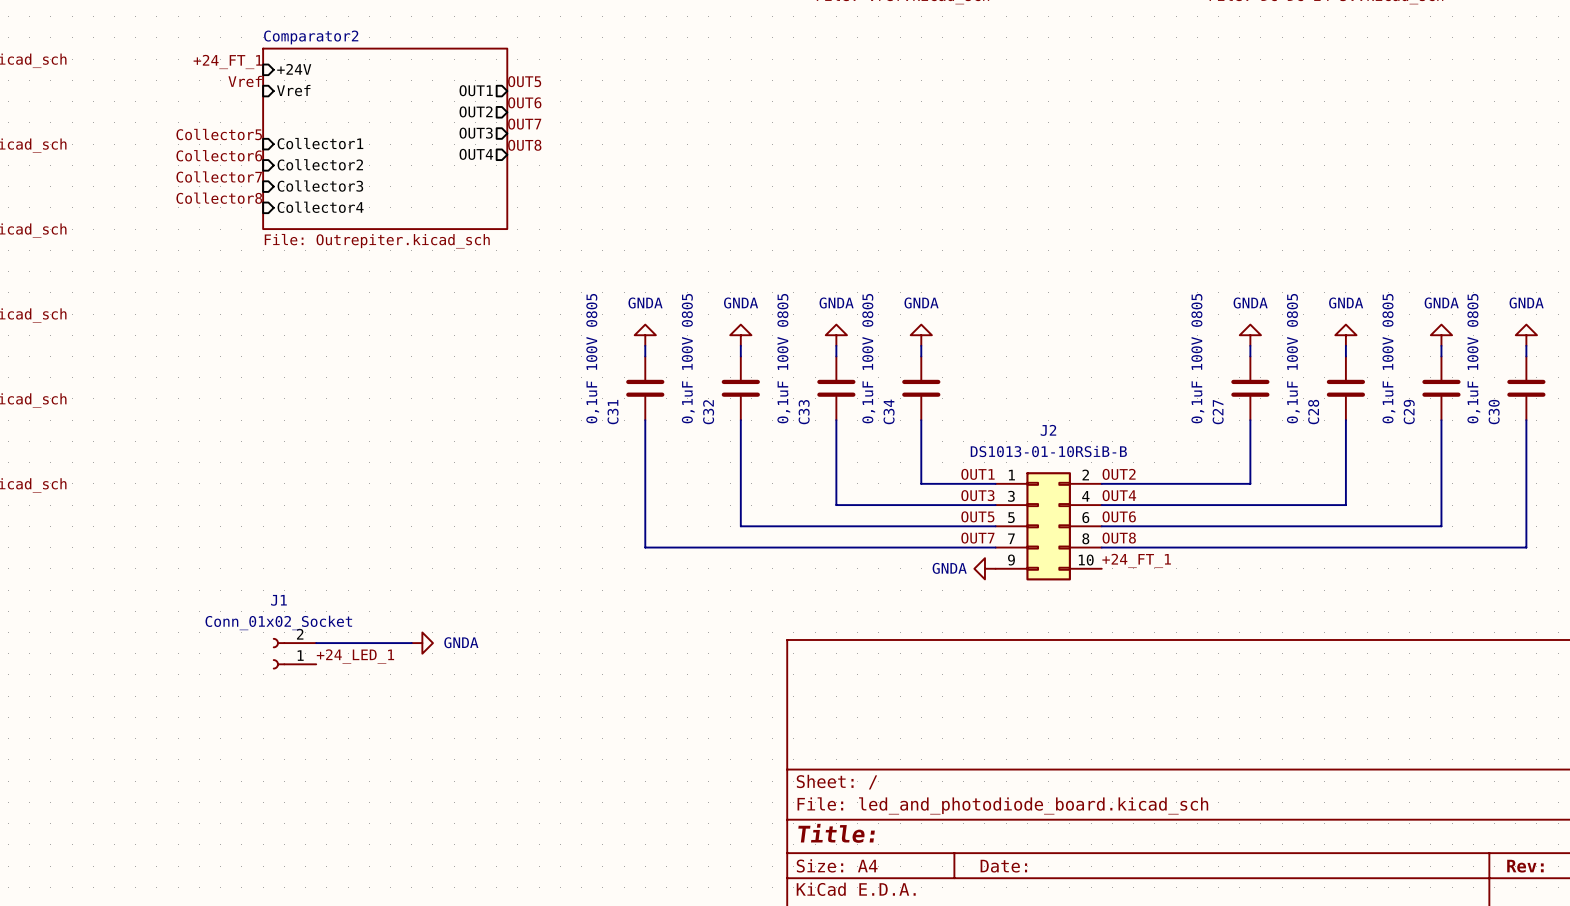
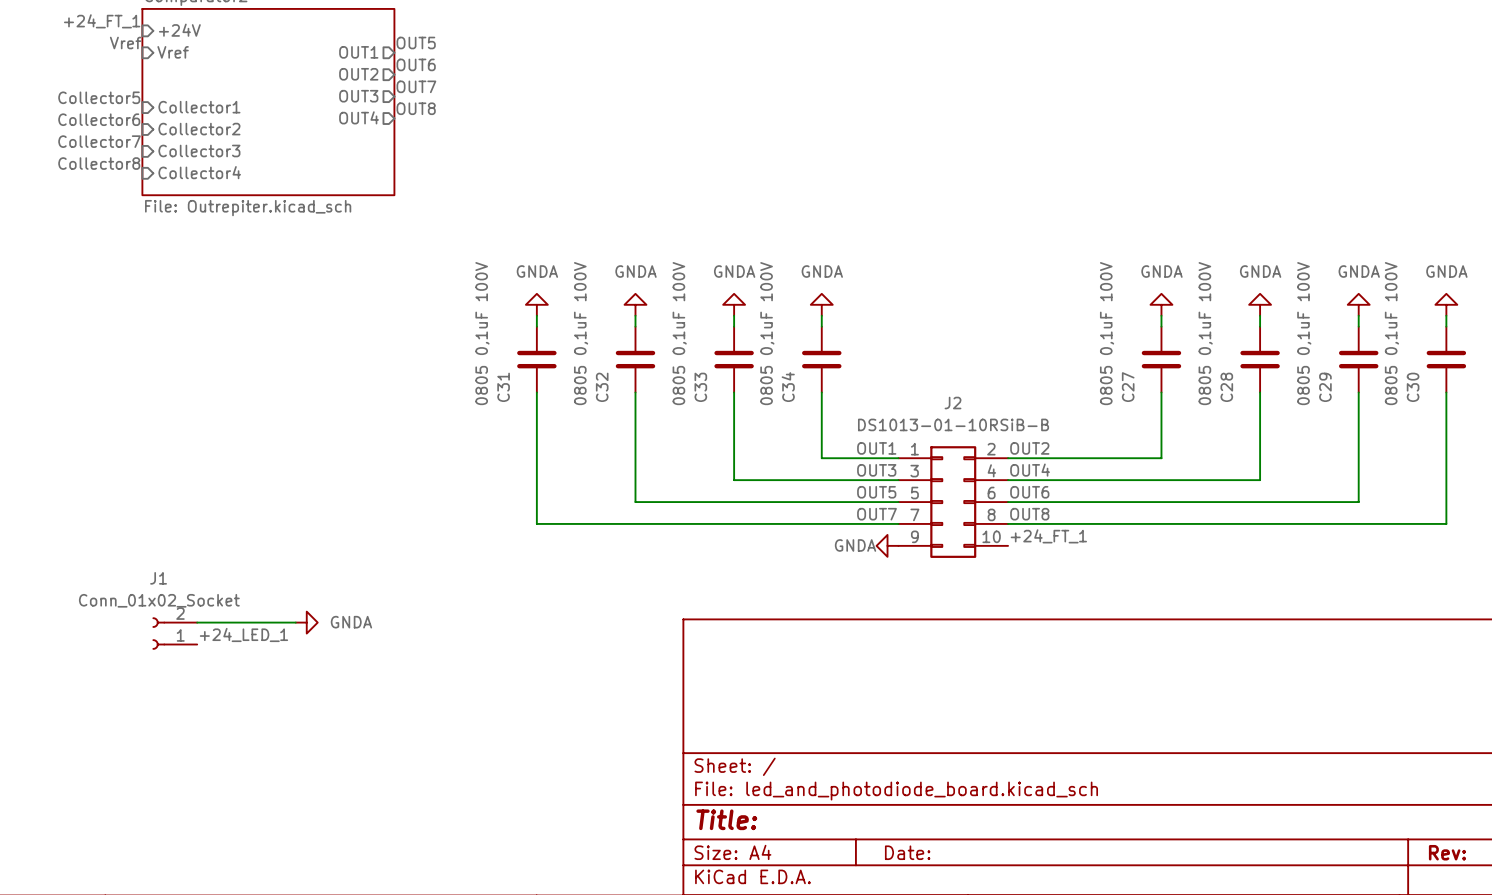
C31 value: 0,1uF 100V 0805 (592, 358) -> 0805 0,1uF 100V (482, 333)
C32 value: 0,1uF 100V 0805 (688, 358) -> 0805 0,1uF 100V (581, 333)
C33 value: 0,1uF 100V 0805 (783, 358) -> 0805 0,1uF 100V (679, 333)
C34 value: 0,1uF 100V 0805 (868, 358) -> 0805 0,1uF 100V (767, 333)
C27 value: 0,1uF 100V 0805 (1197, 358) -> 0805 0,1uF 100V (1107, 333)
C28 value: 0,1uF 100V 0805 (1293, 358) -> 0805 0,1uF 100V (1205, 333)
C29 value: 0,1uF 100V 0805 (1388, 358) -> 0805 0,1uF 100V (1304, 333)
C30 value: 0,1uF 100V 0805 (1473, 358) -> 0805 0,1uF 100V (1391, 333)

